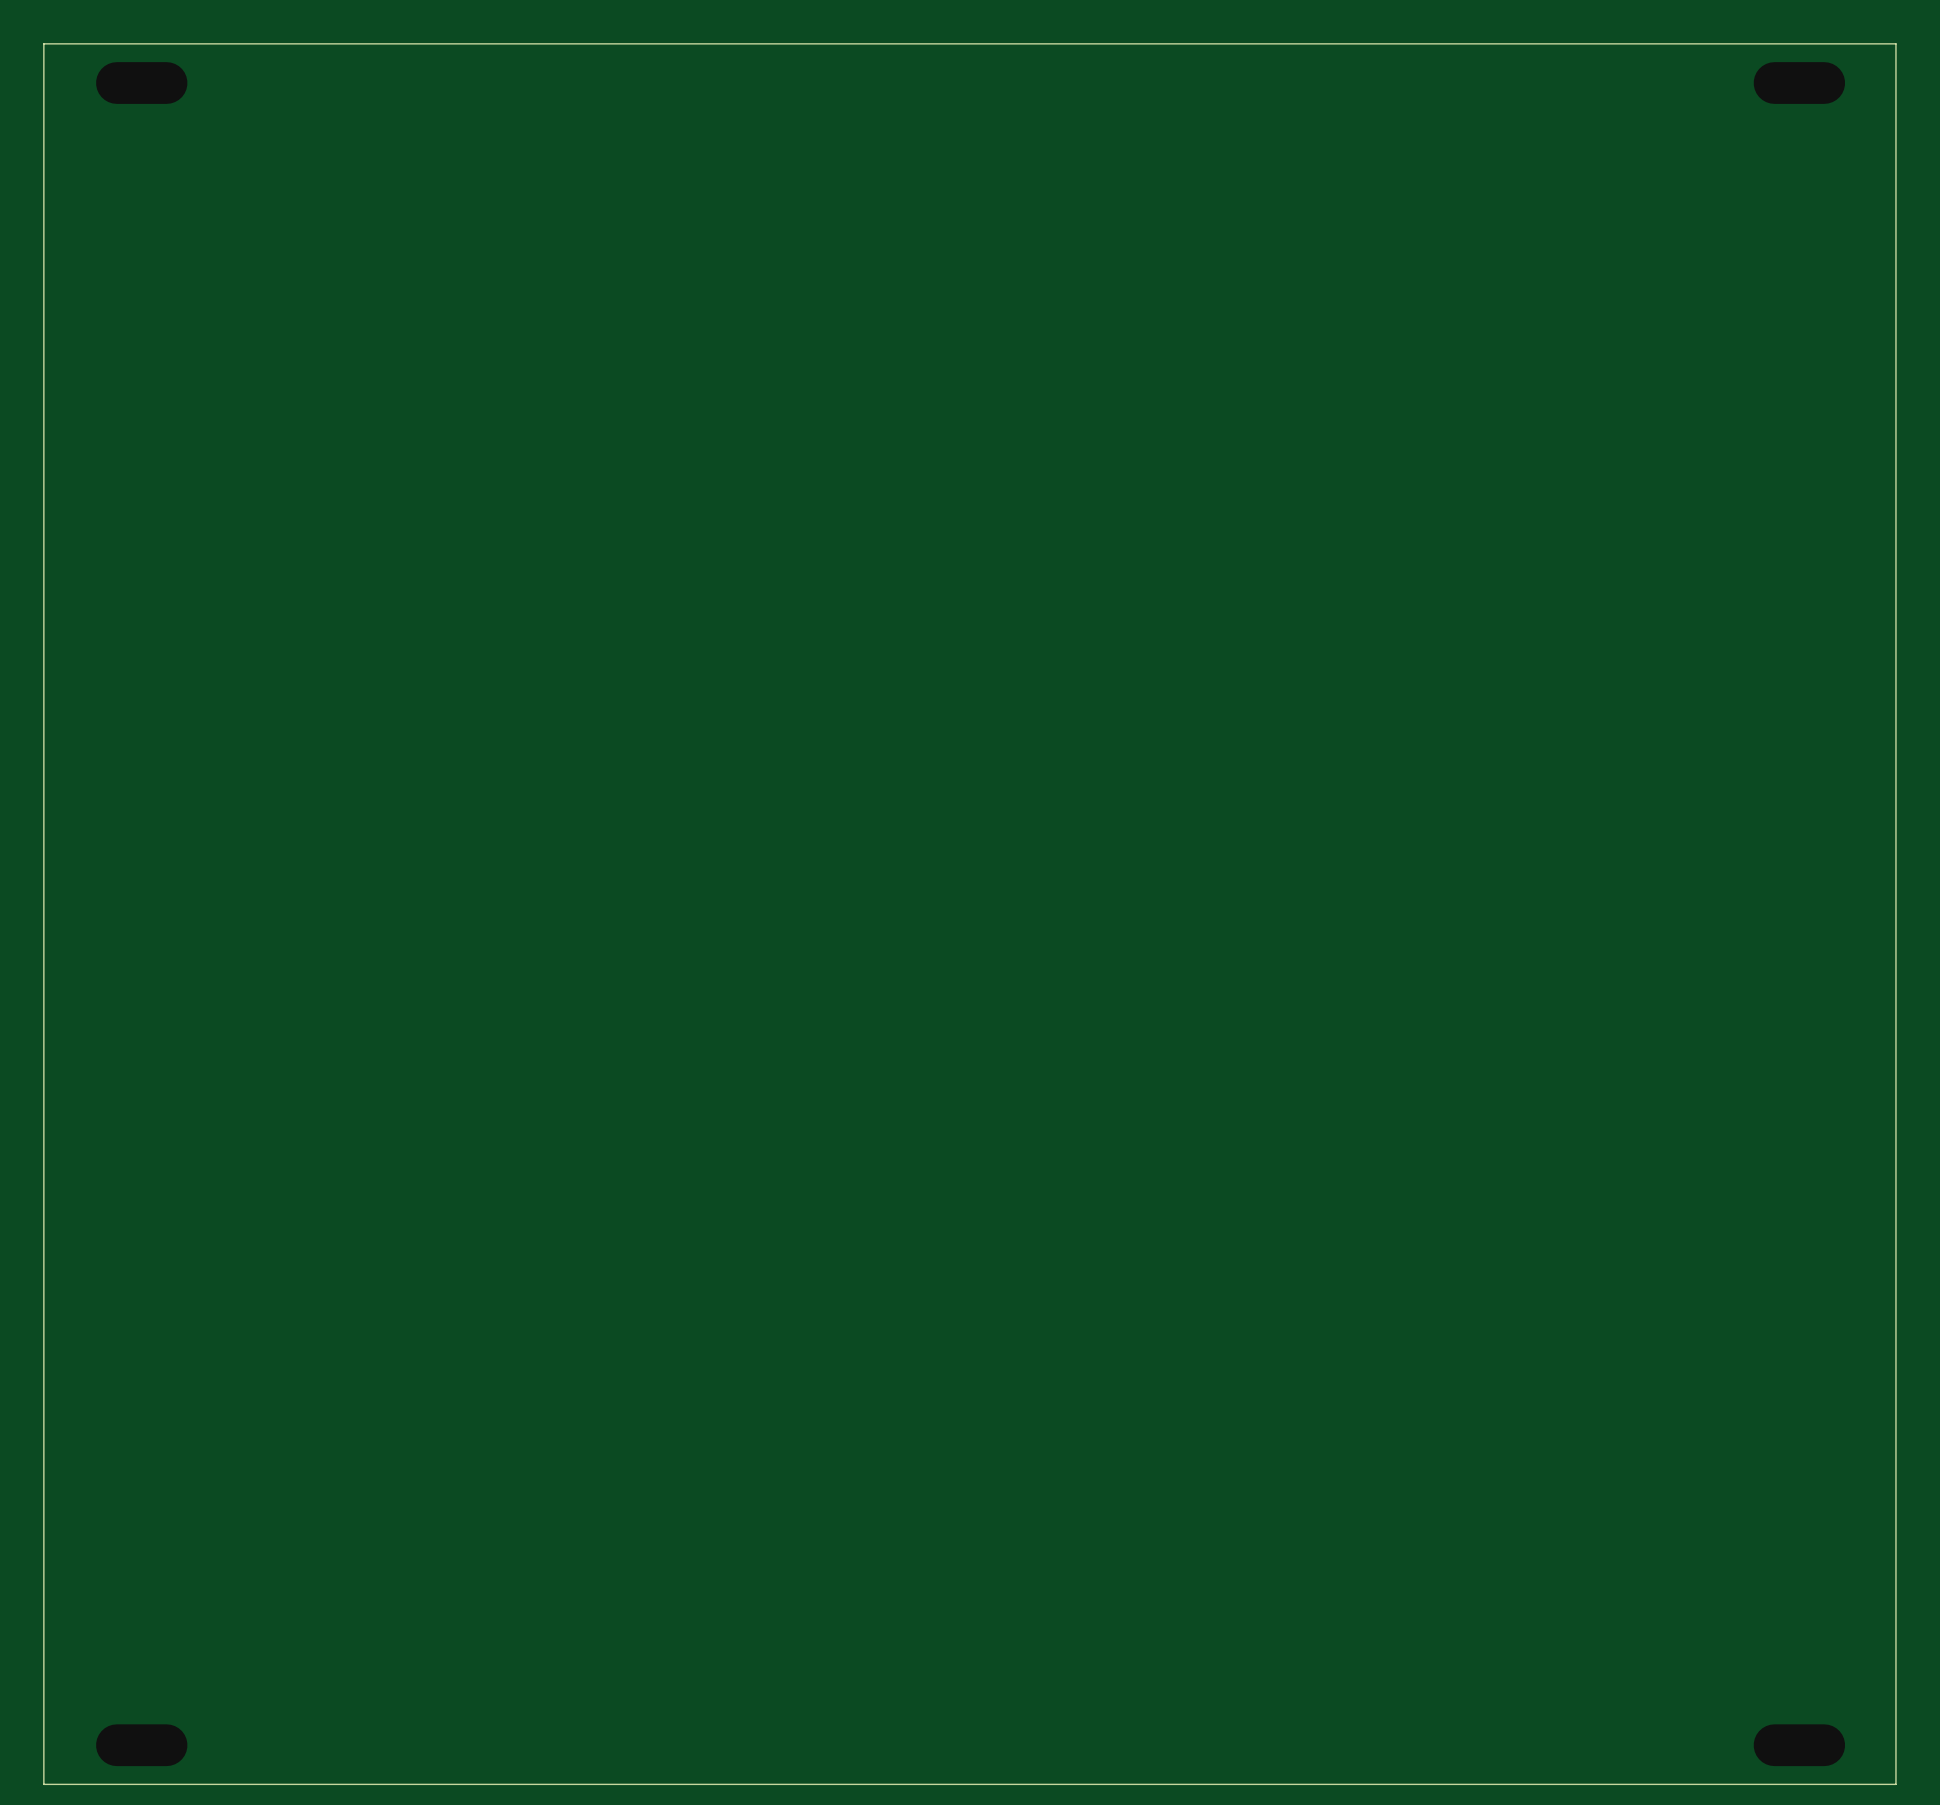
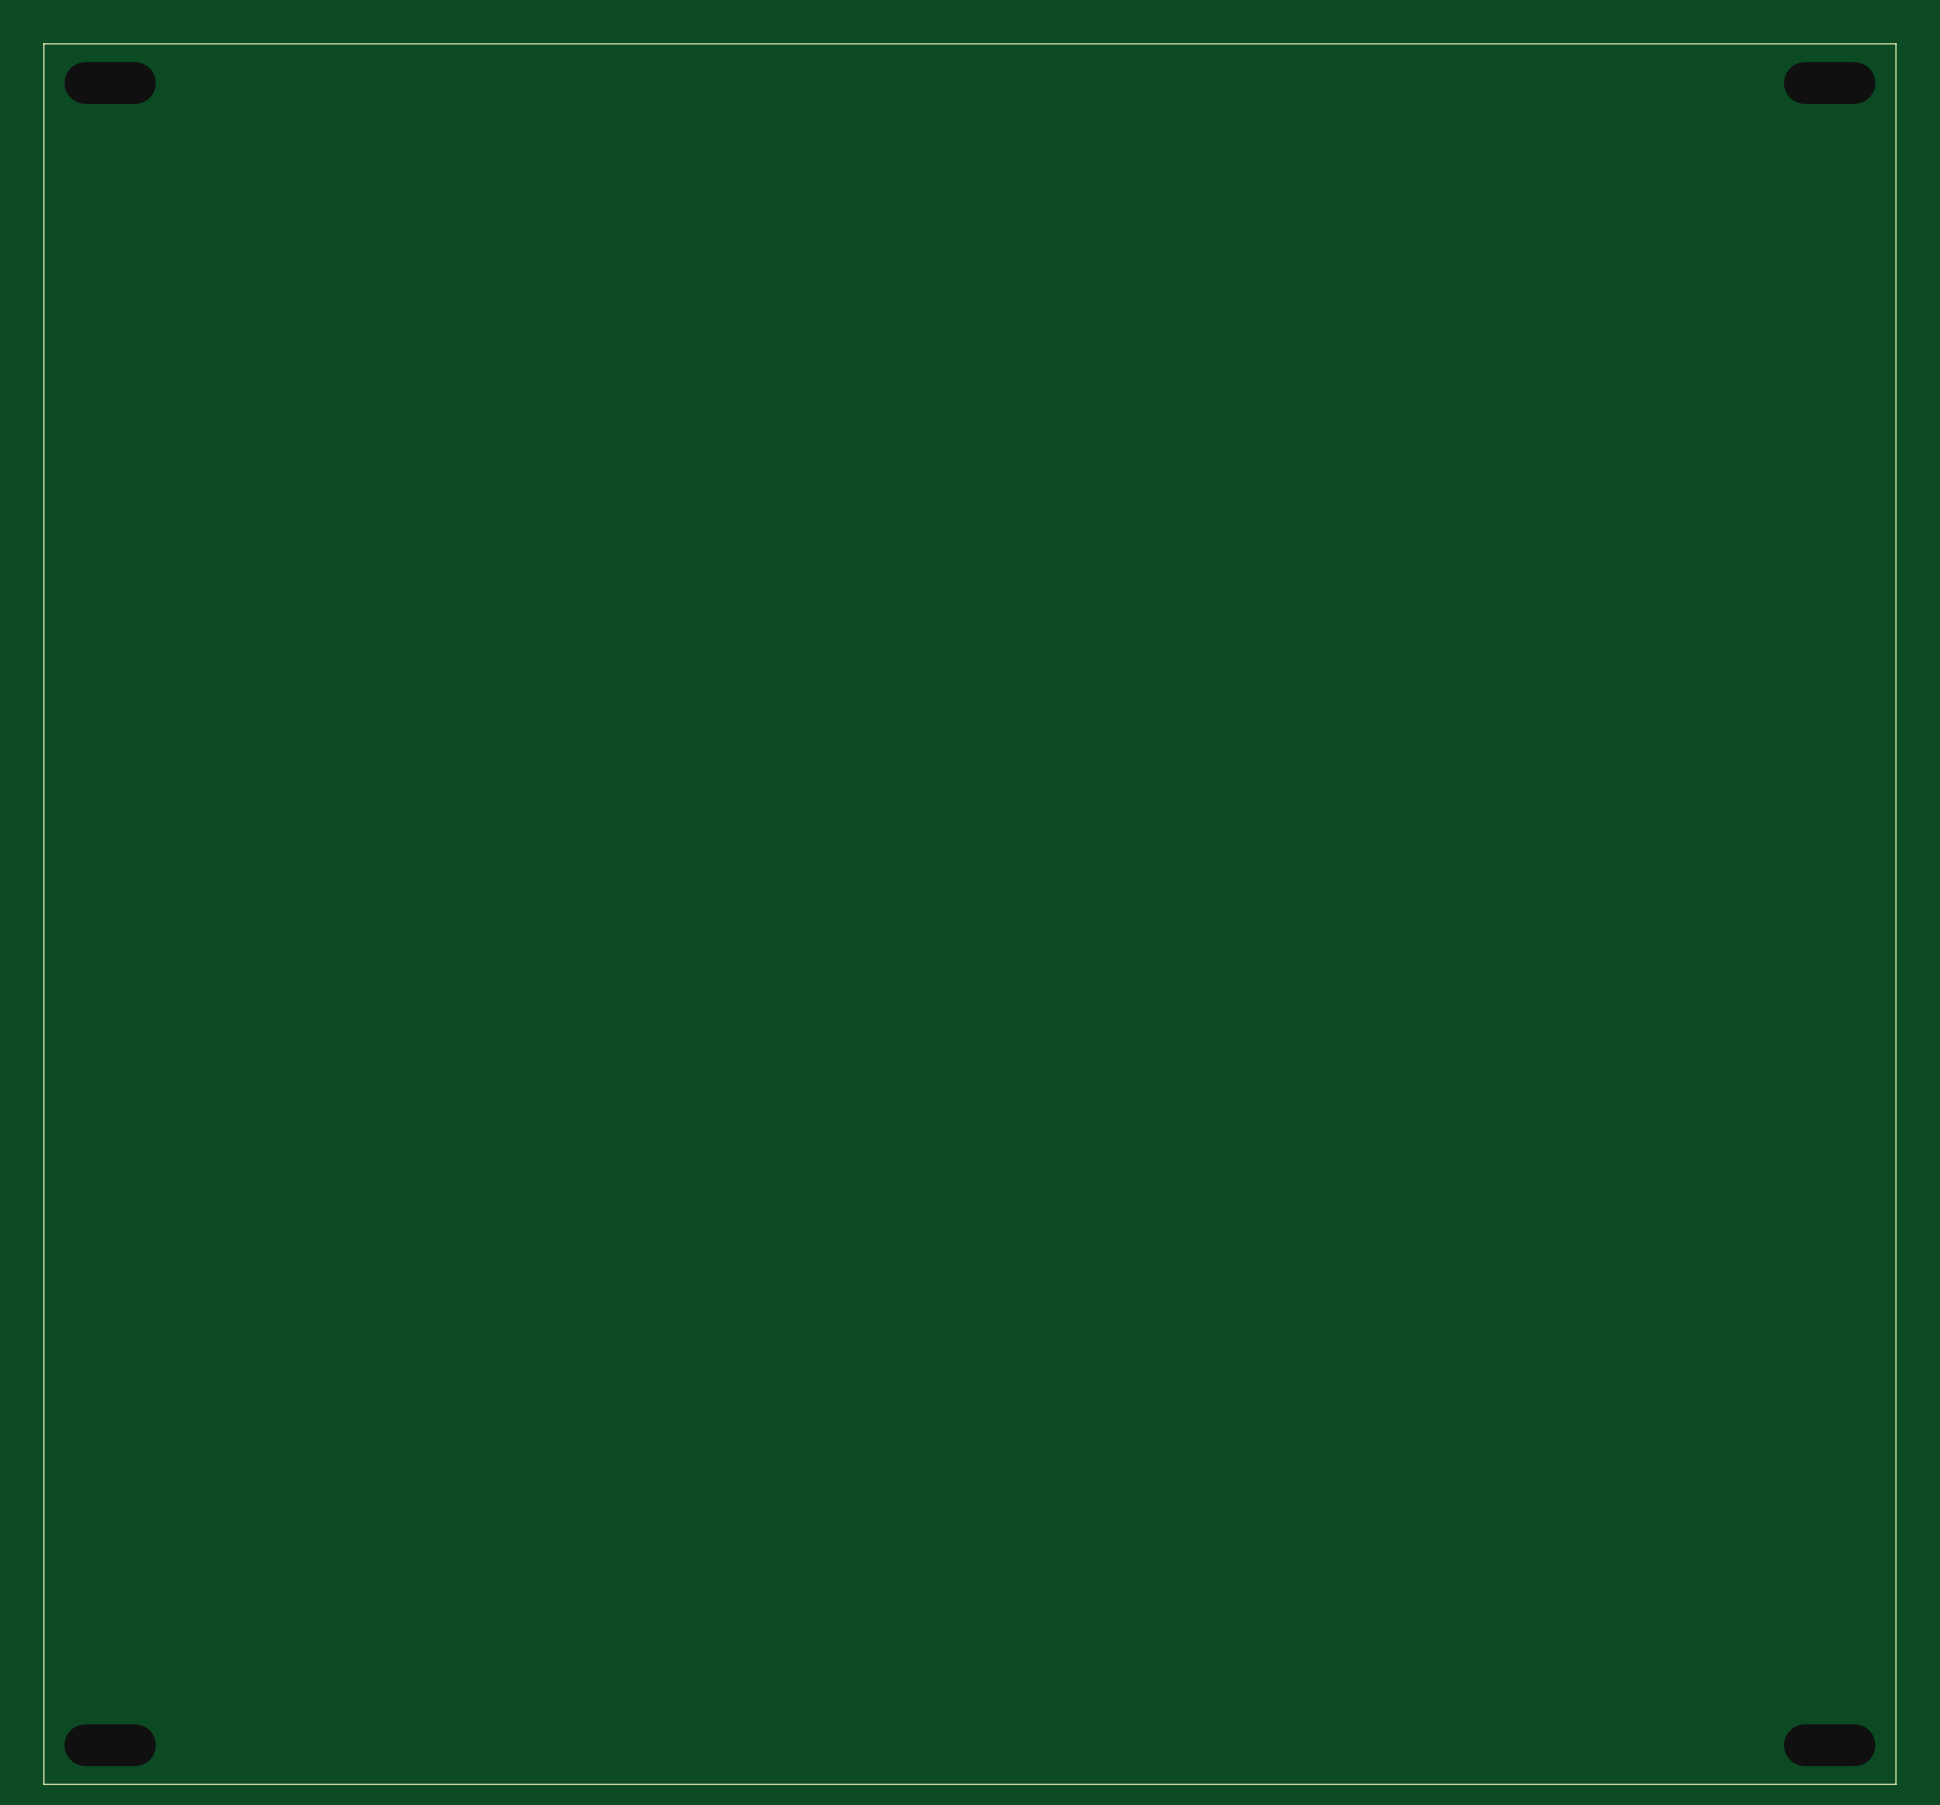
part position: (141, 83) -> (110, 83)
part position: (1799, 83) -> (1829, 83)
part position: (141, 1745) -> (110, 1745)
part position: (1799, 1745) -> (1829, 1745)

